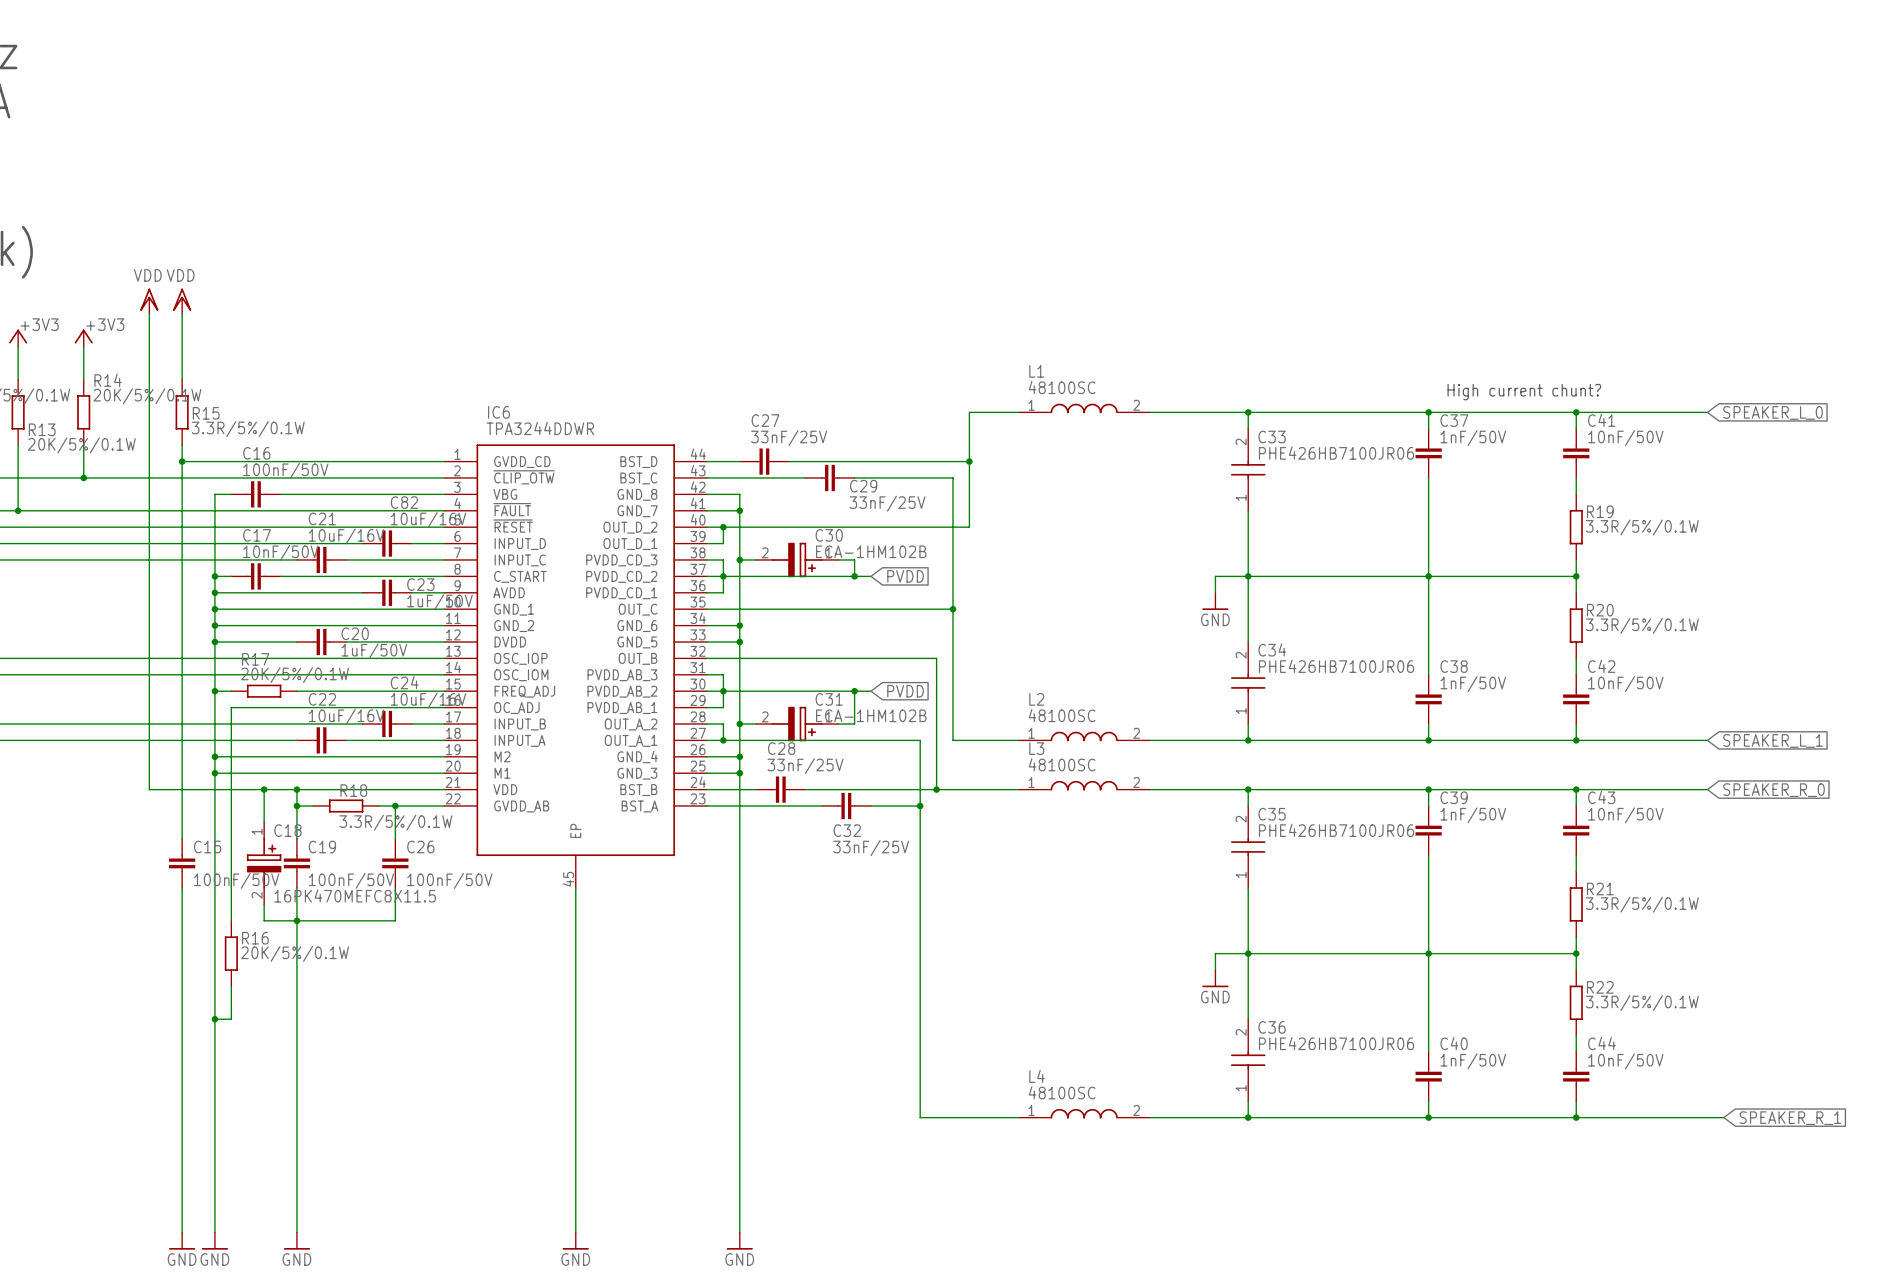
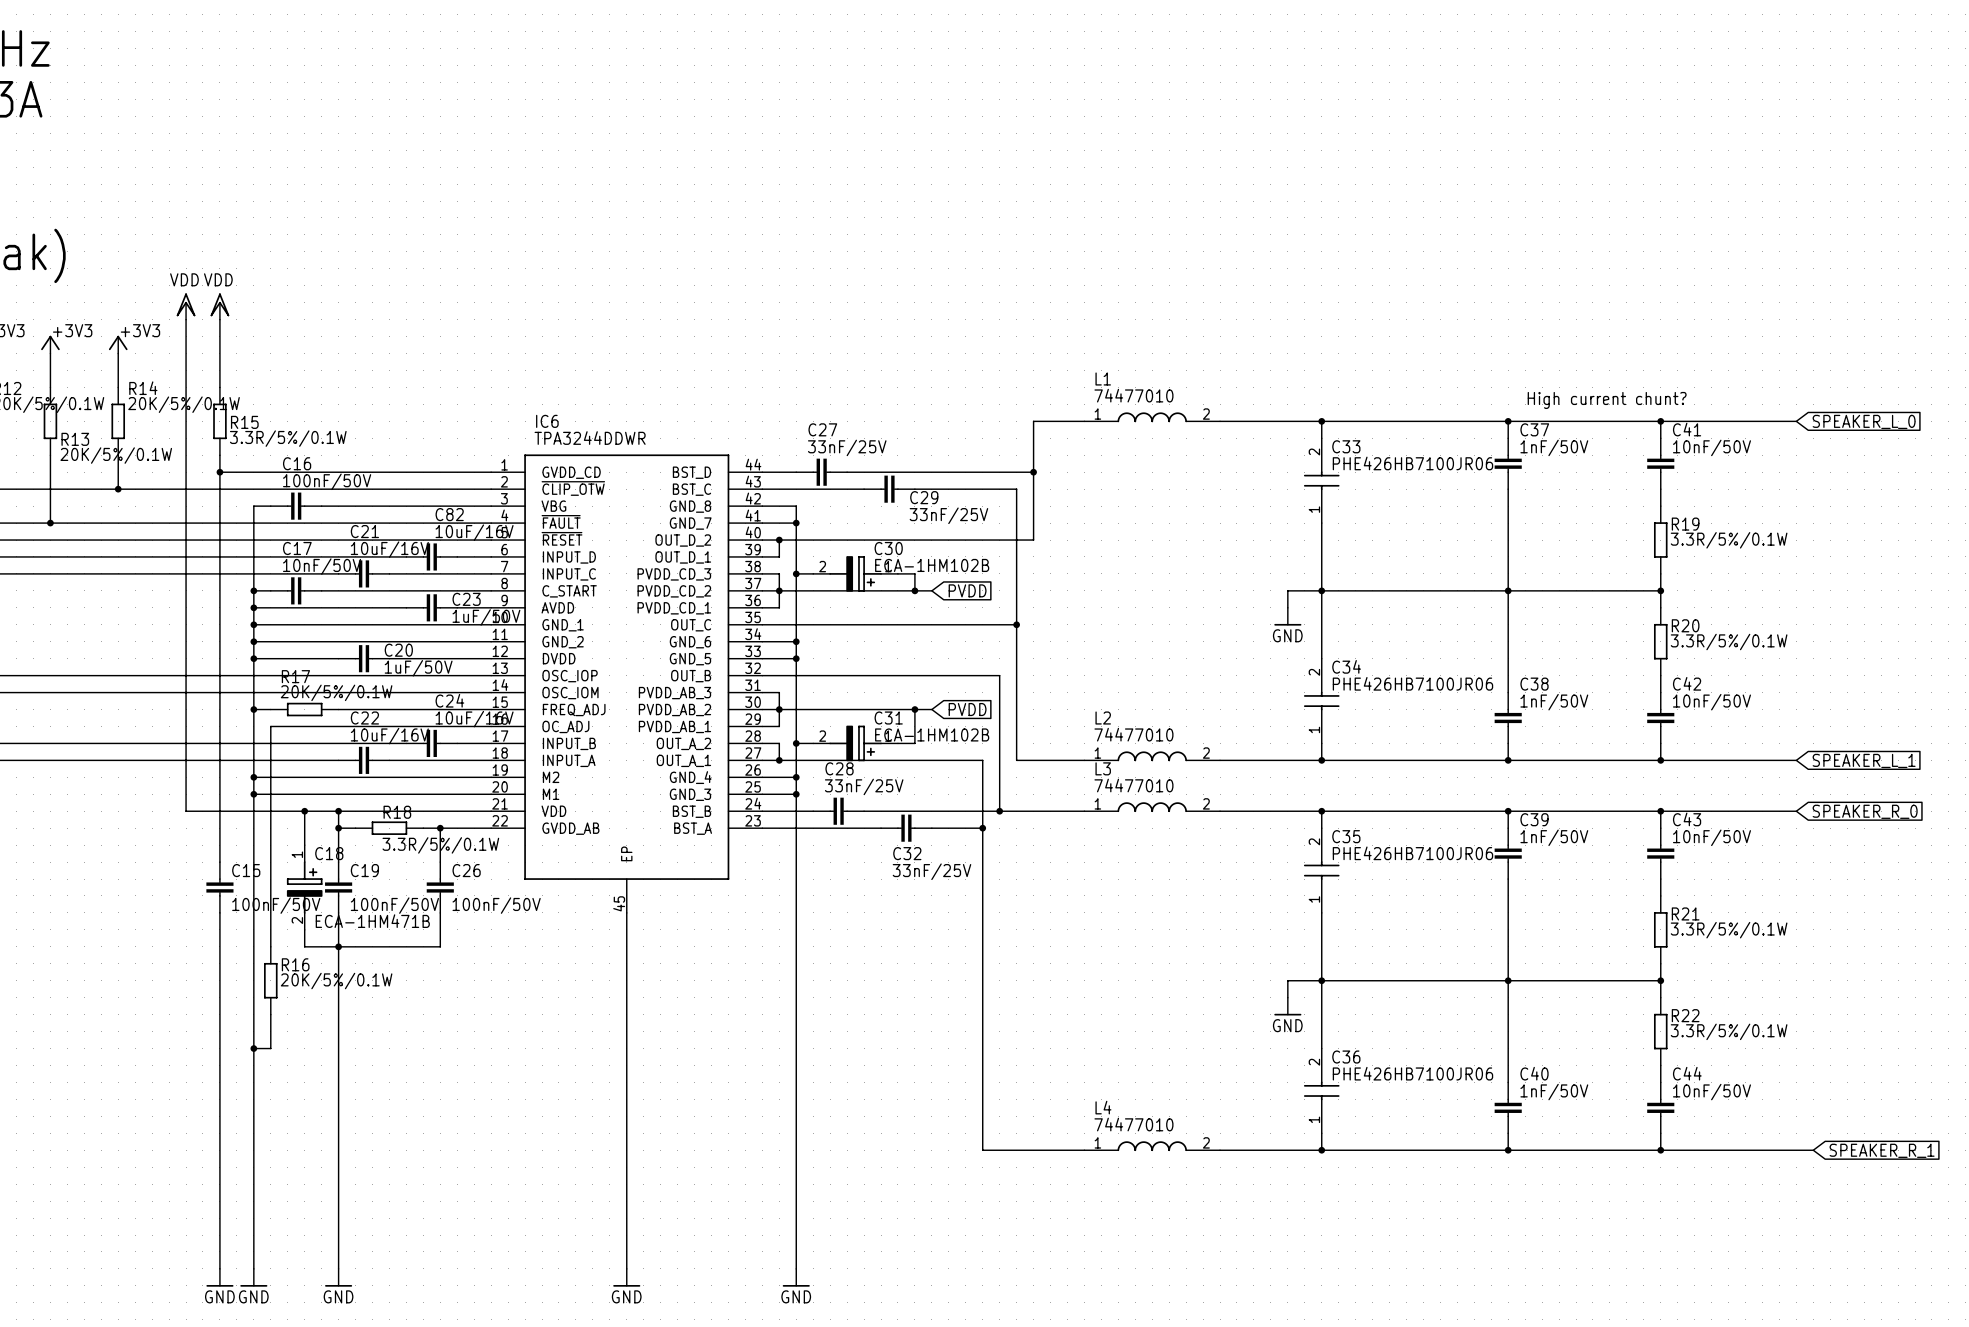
L1 value: 48100SC (1062, 387) -> 74477010 (1133, 395)
L2 value: 48100SC (1062, 715) -> 74477010 (1133, 734)
L3 value: 48100SC (1062, 764) -> 74477010 (1133, 785)
C18 value: 16PK470MEFC8X11.5 (355, 895) -> ECA-1HM471B (372, 921)
L4 value: 48100SC (1062, 1092) -> 74477010 (1133, 1124)

